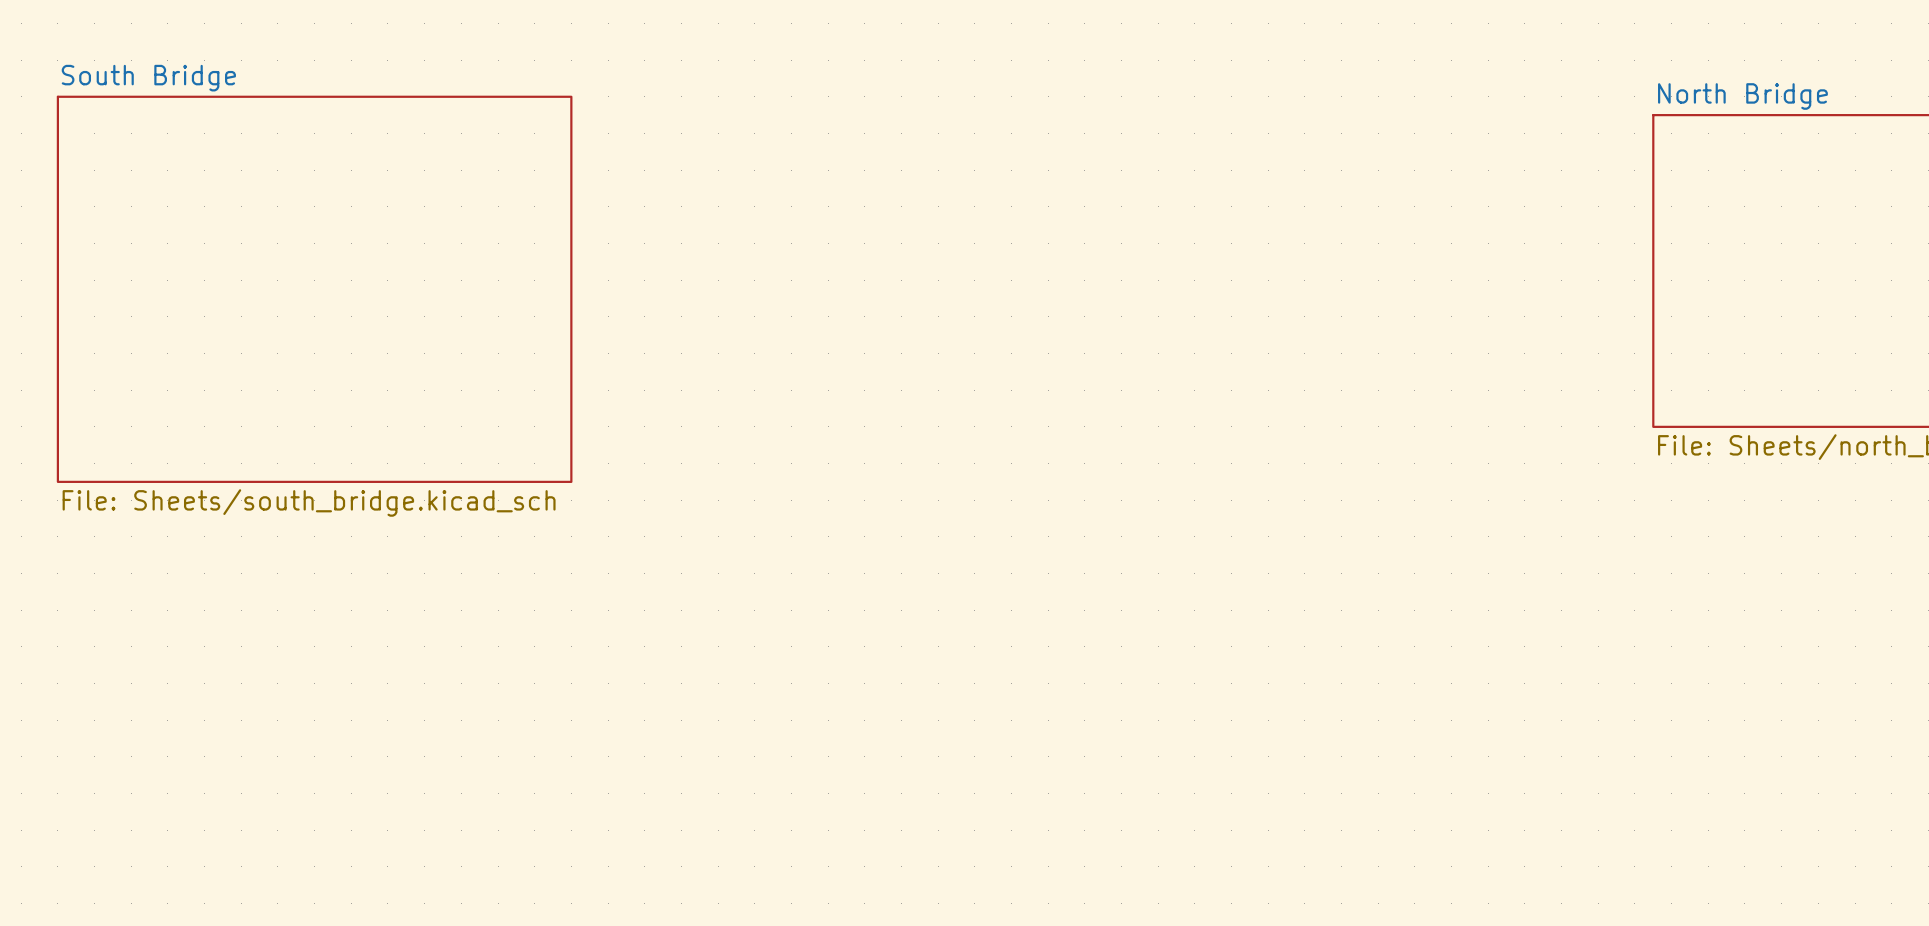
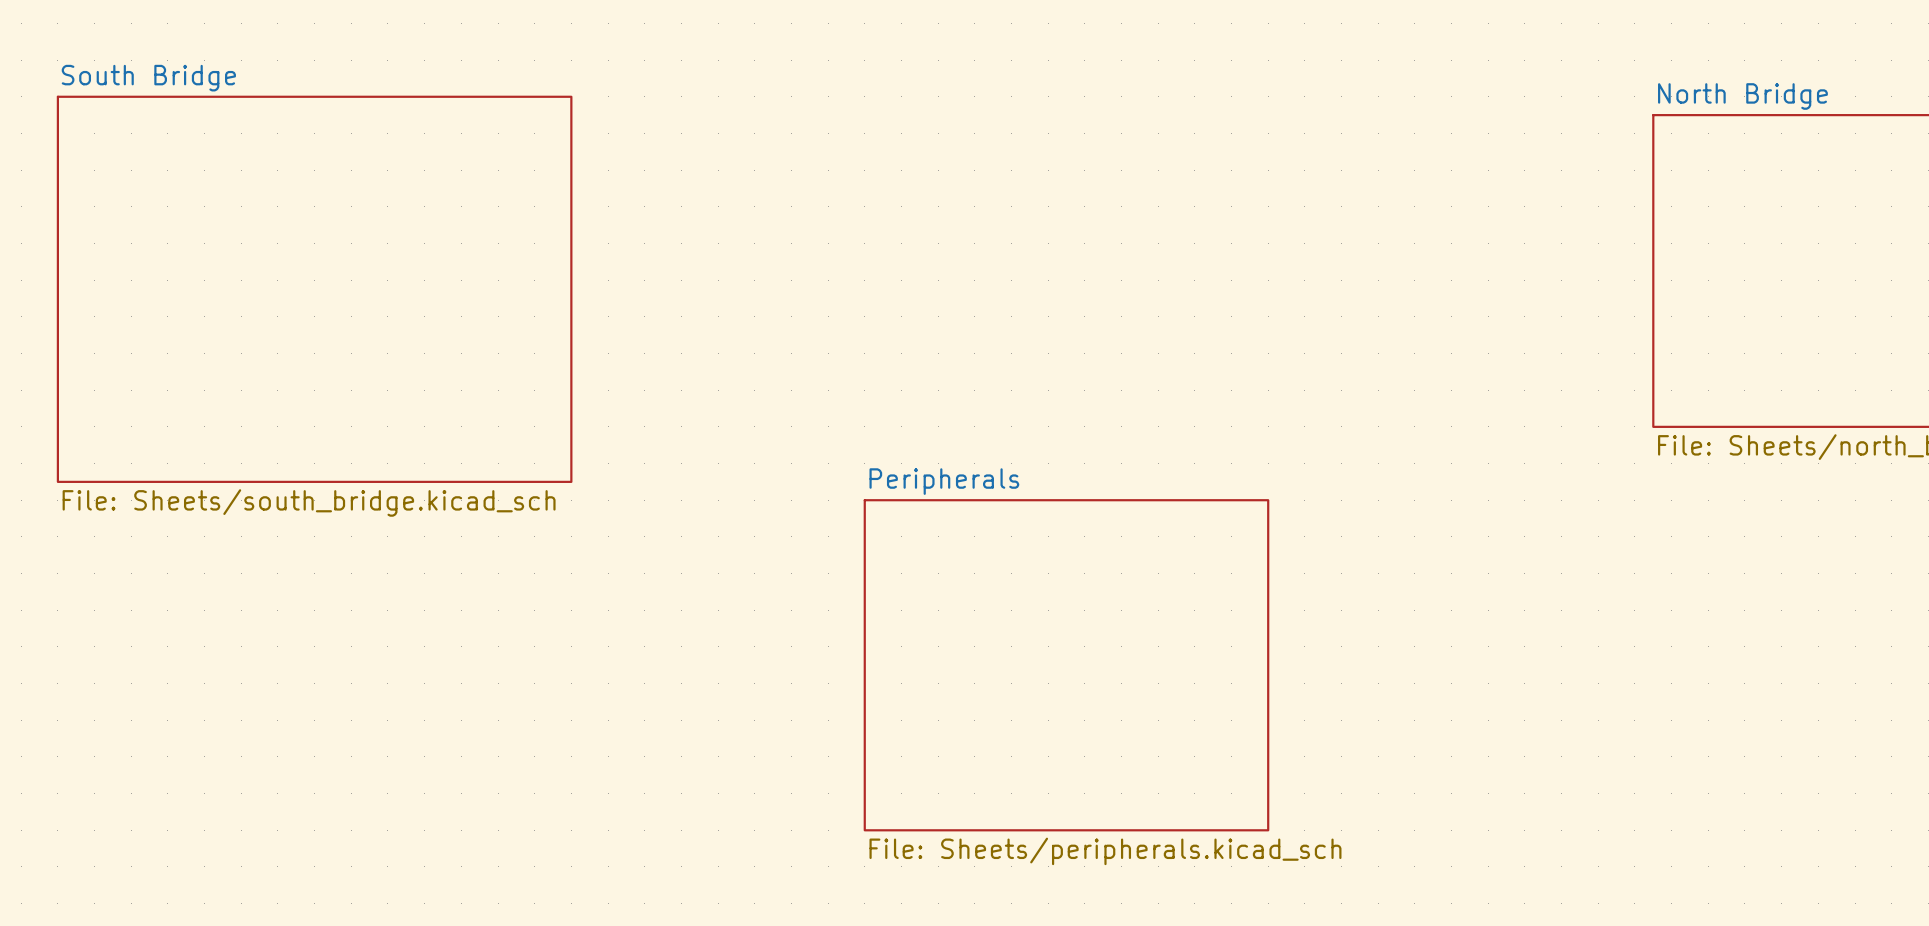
sheet Peripherals: none -> File: Sheets/peripherals.kicad_sch (1066, 665)

